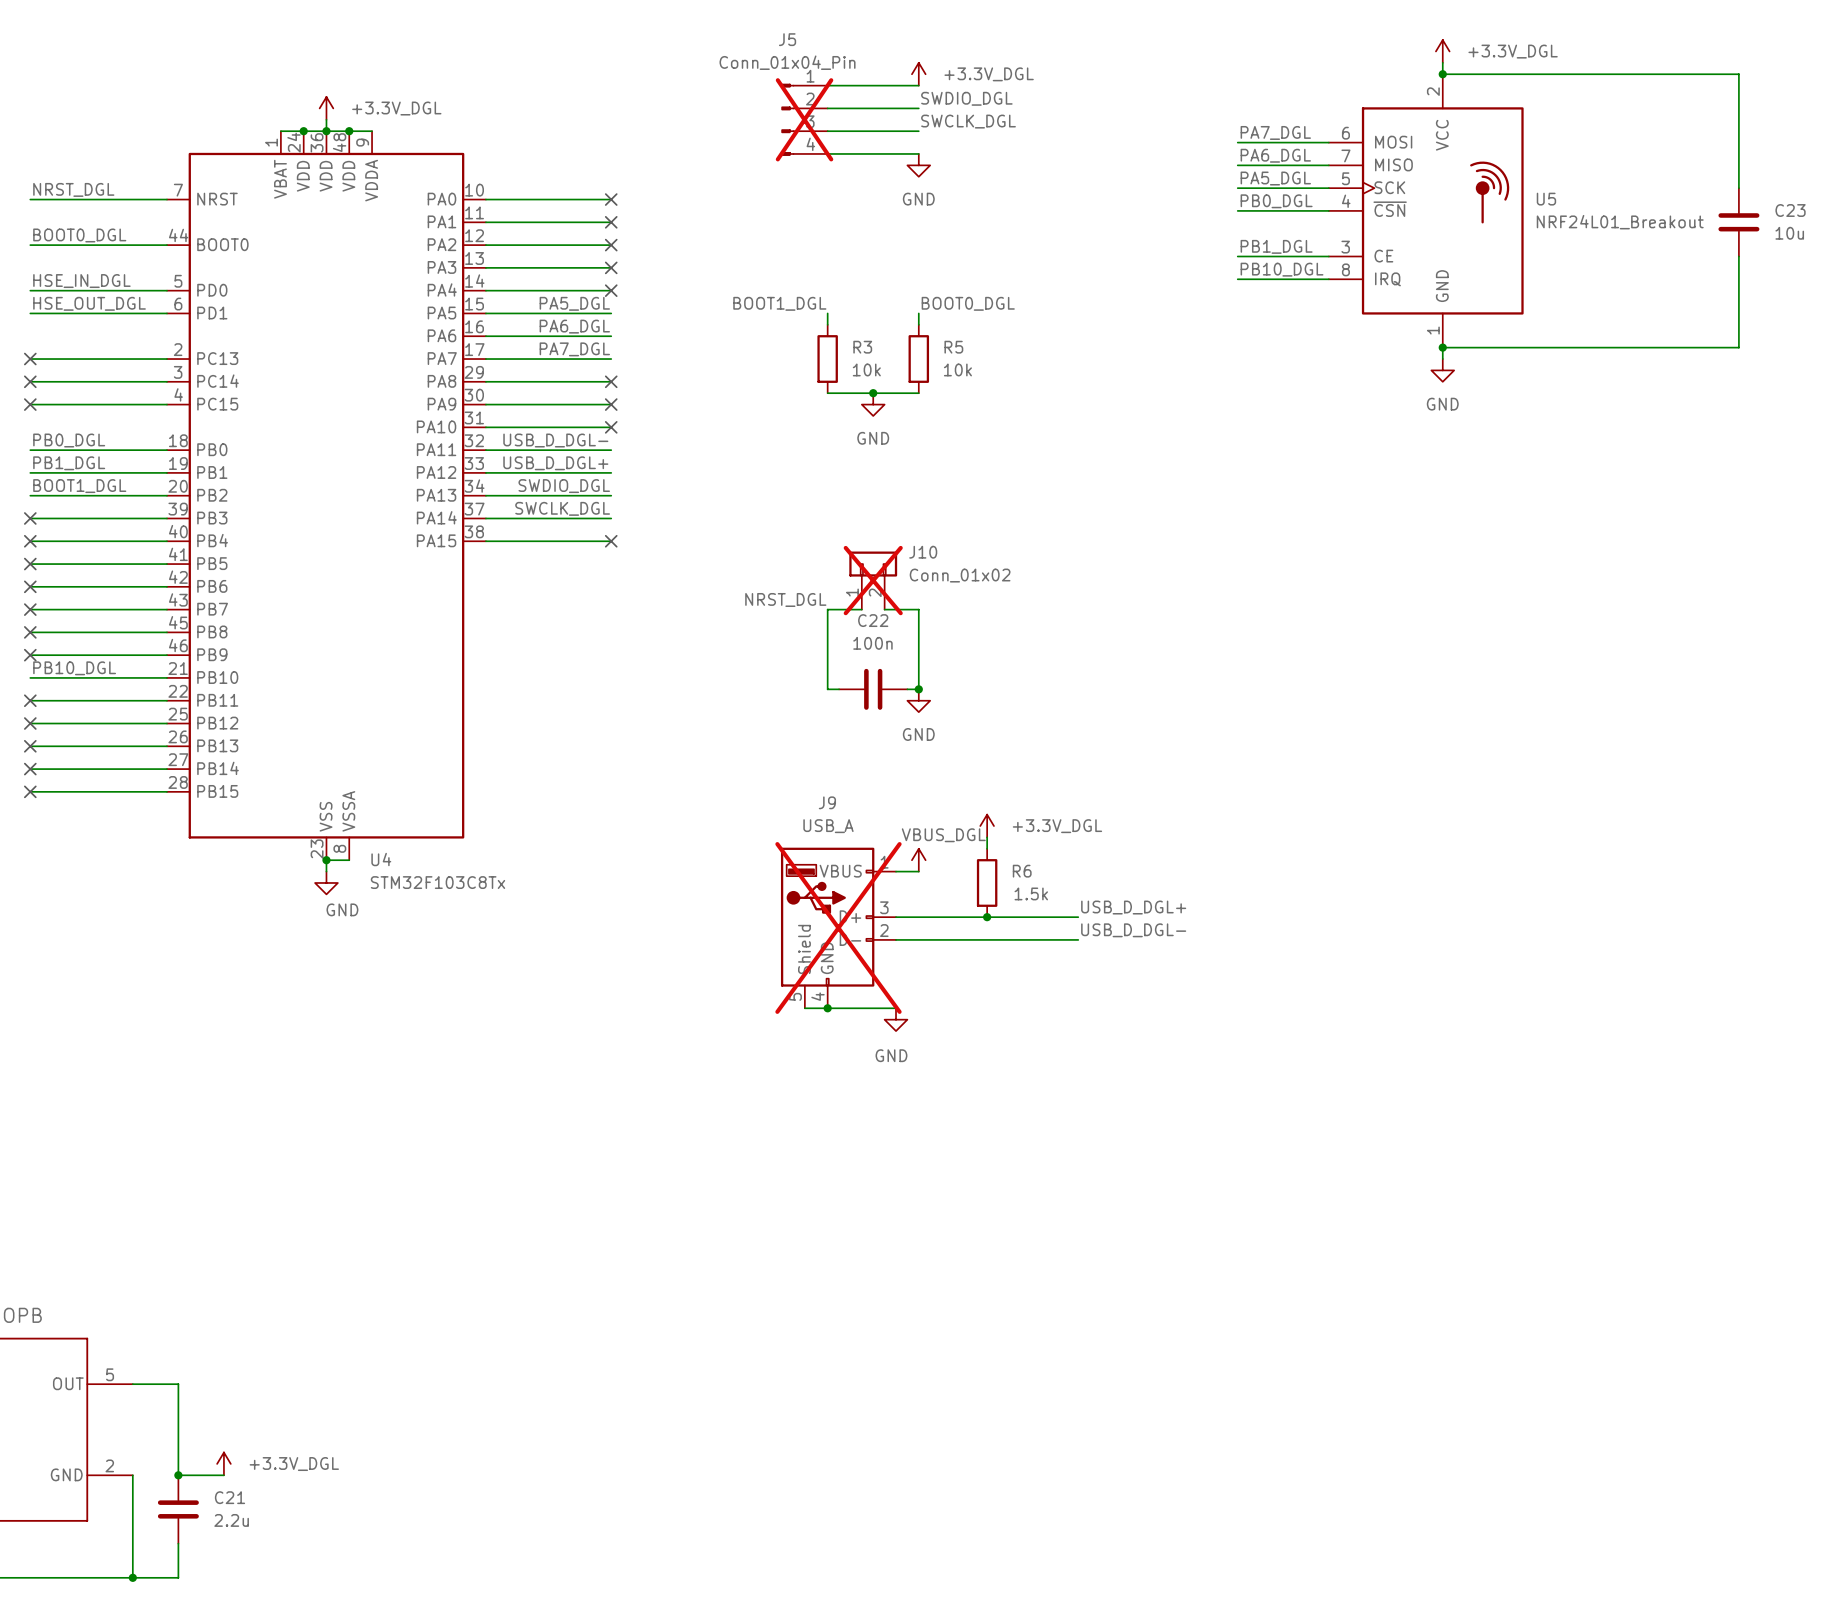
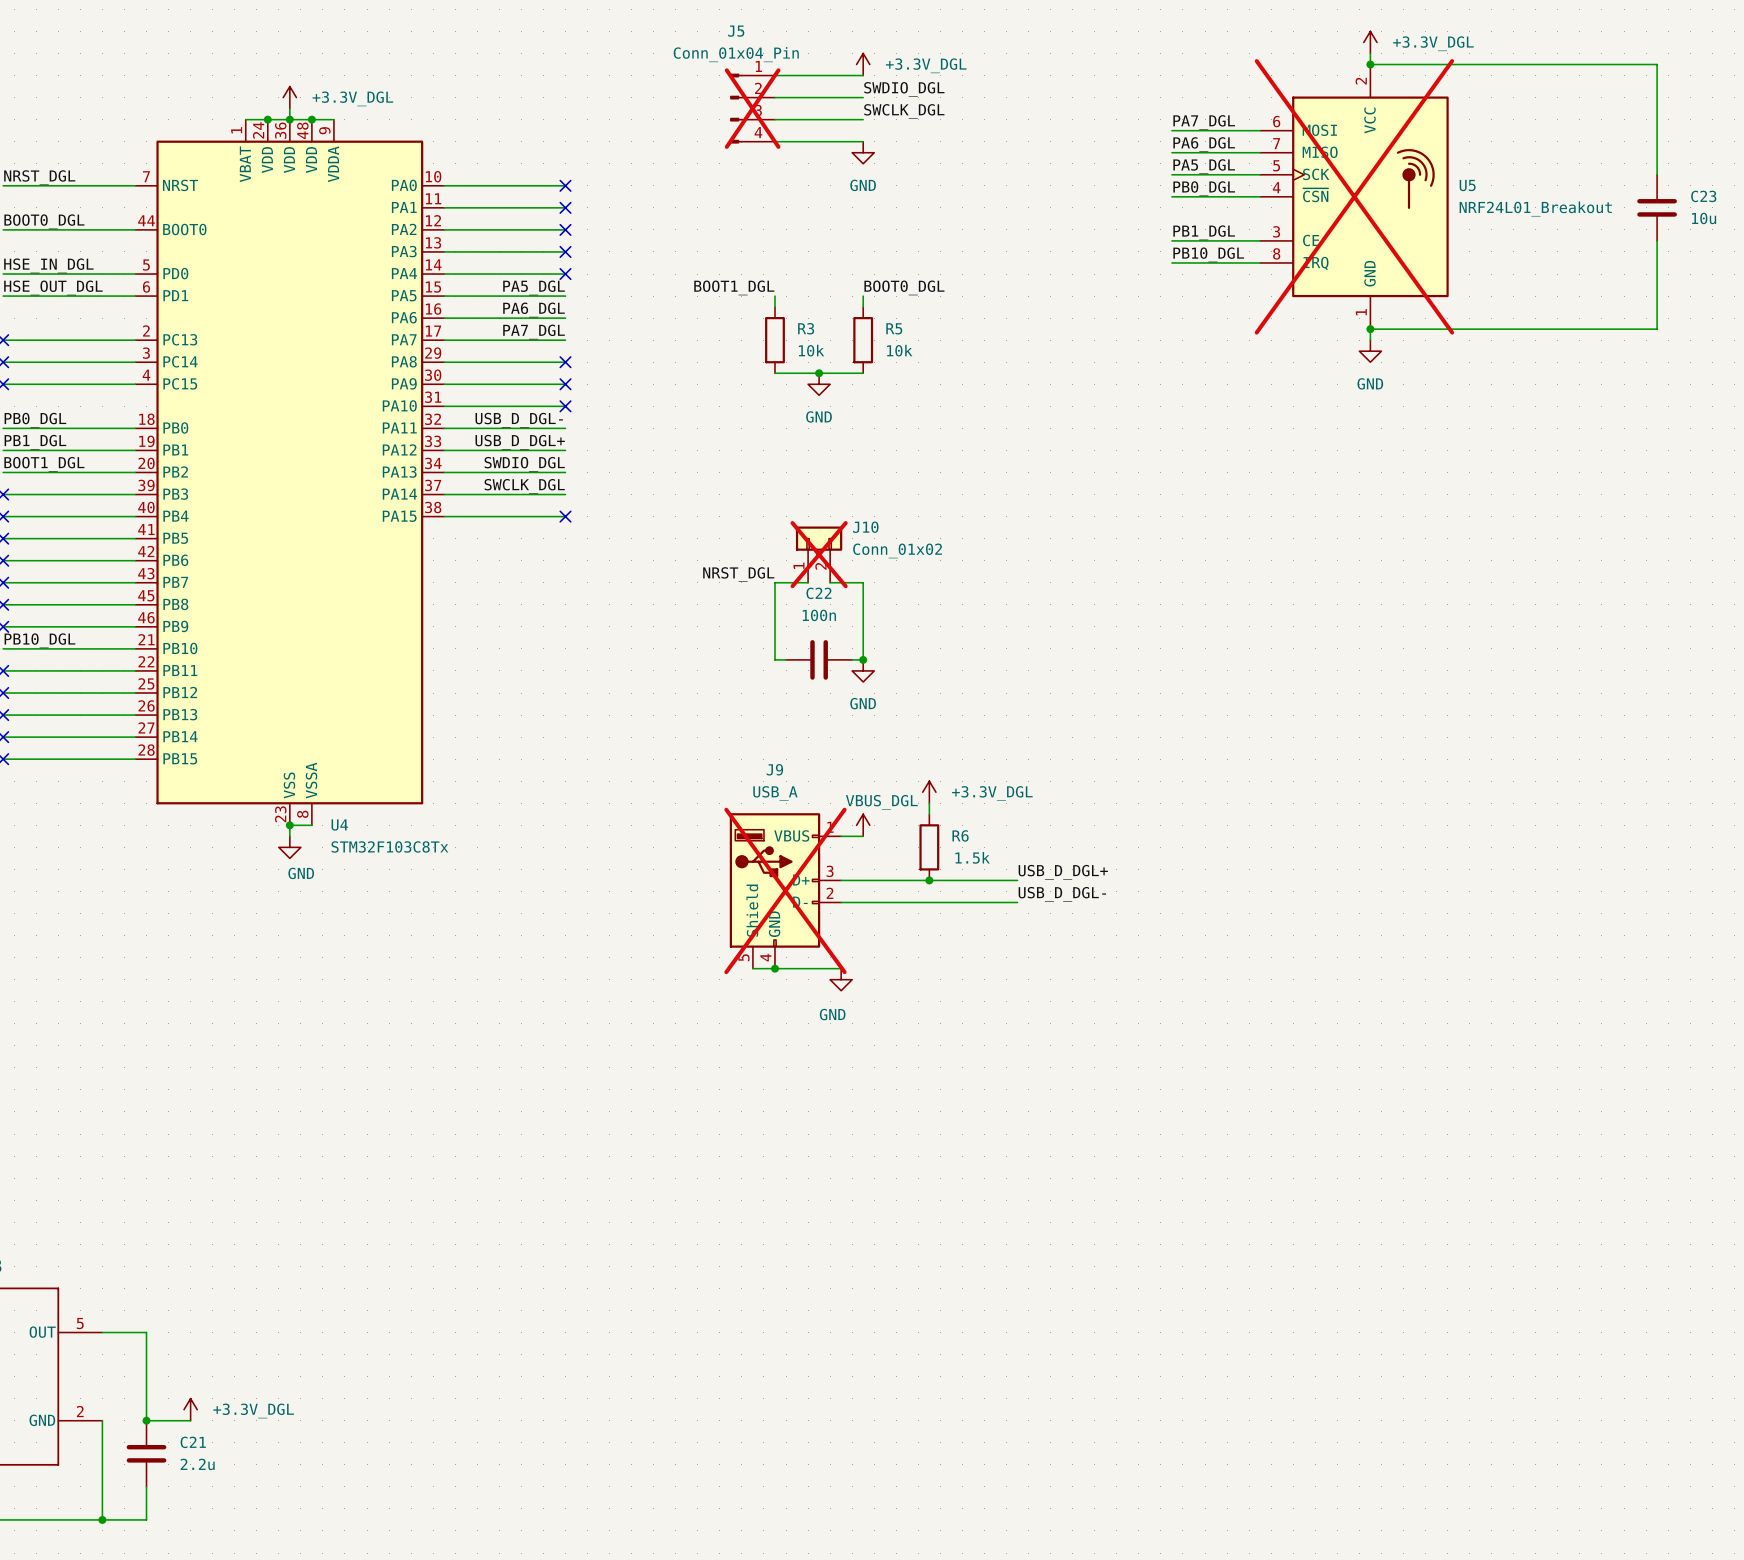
U5 do-not-place cross: none -> (1354, 196)

